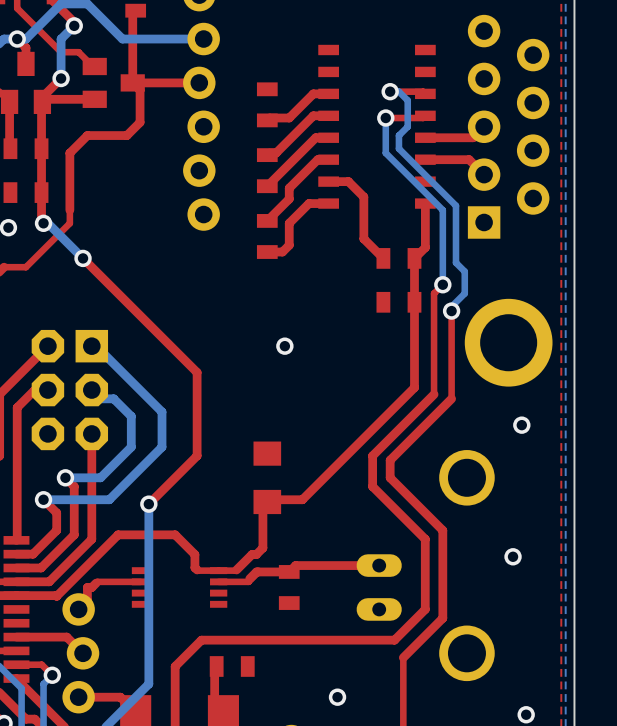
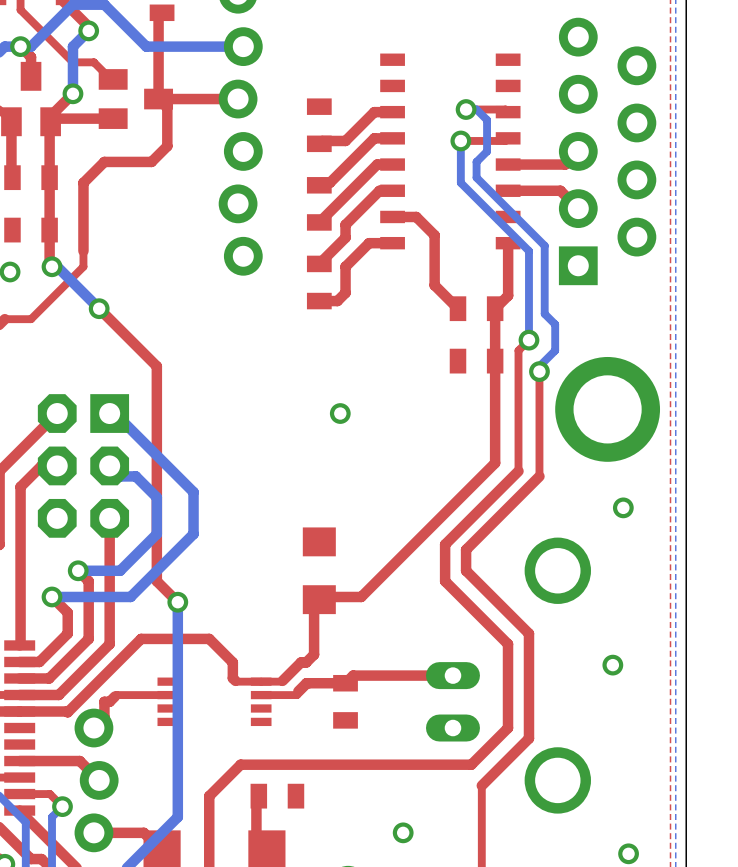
top track: (131, 306) (197, 372) (197, 455) (148, 504) -> (156, 366) (156, 581) (177, 602)

